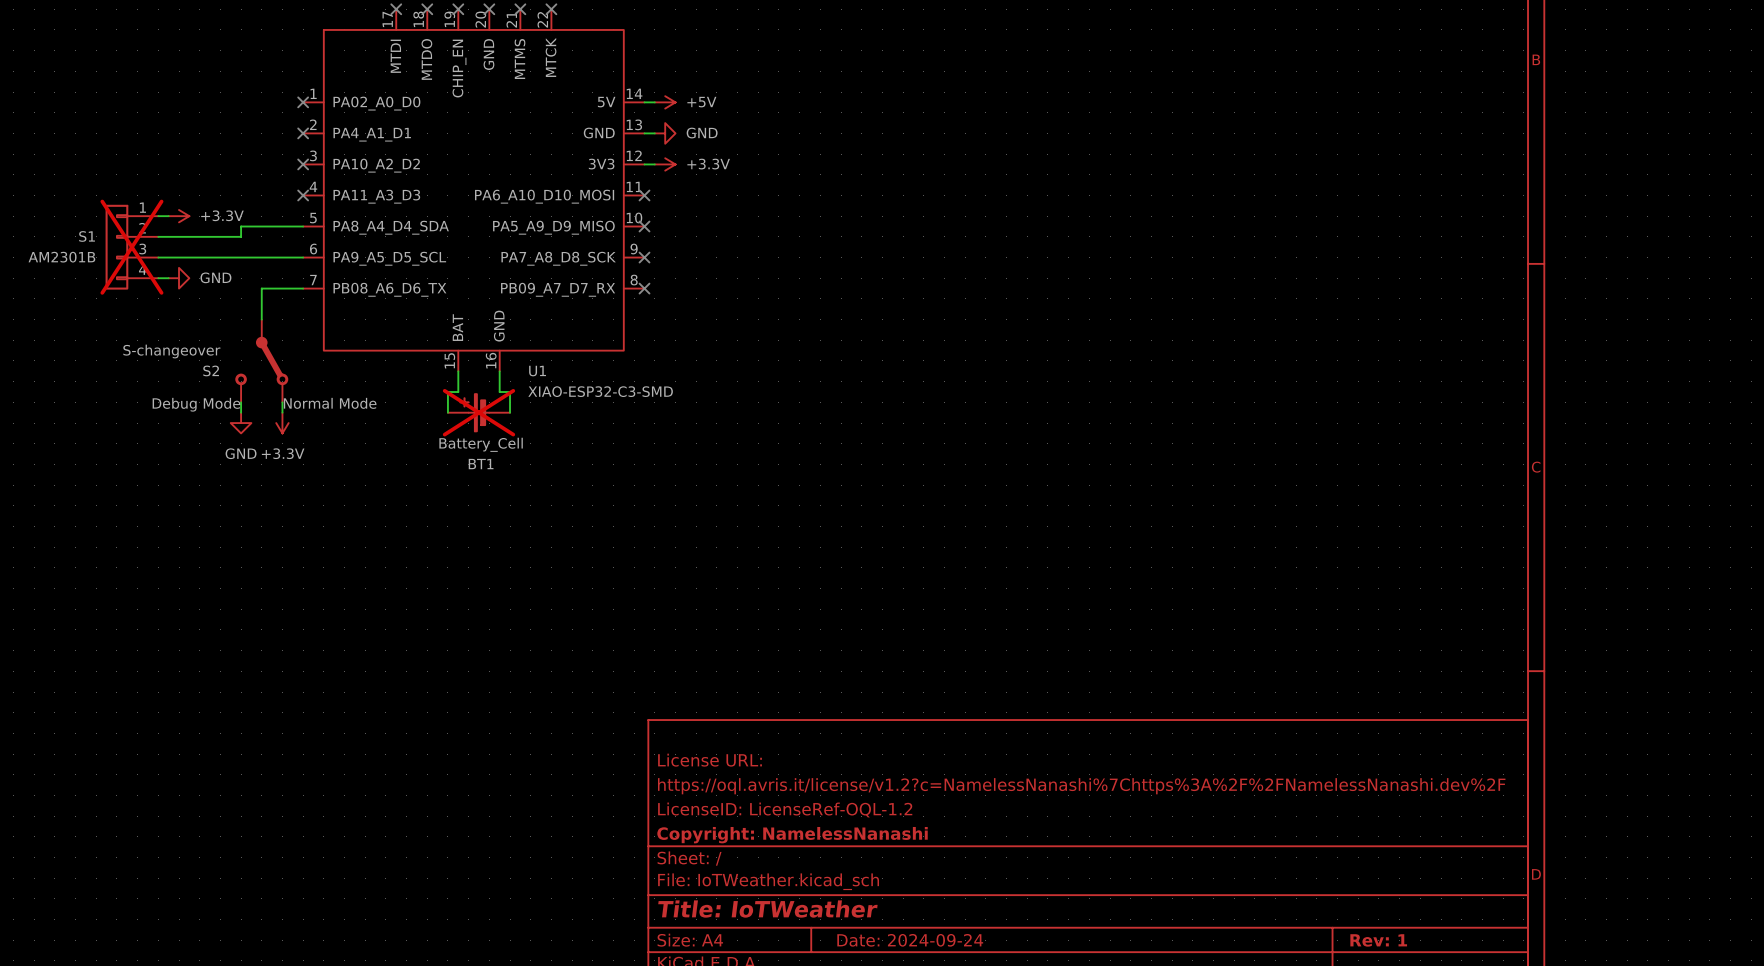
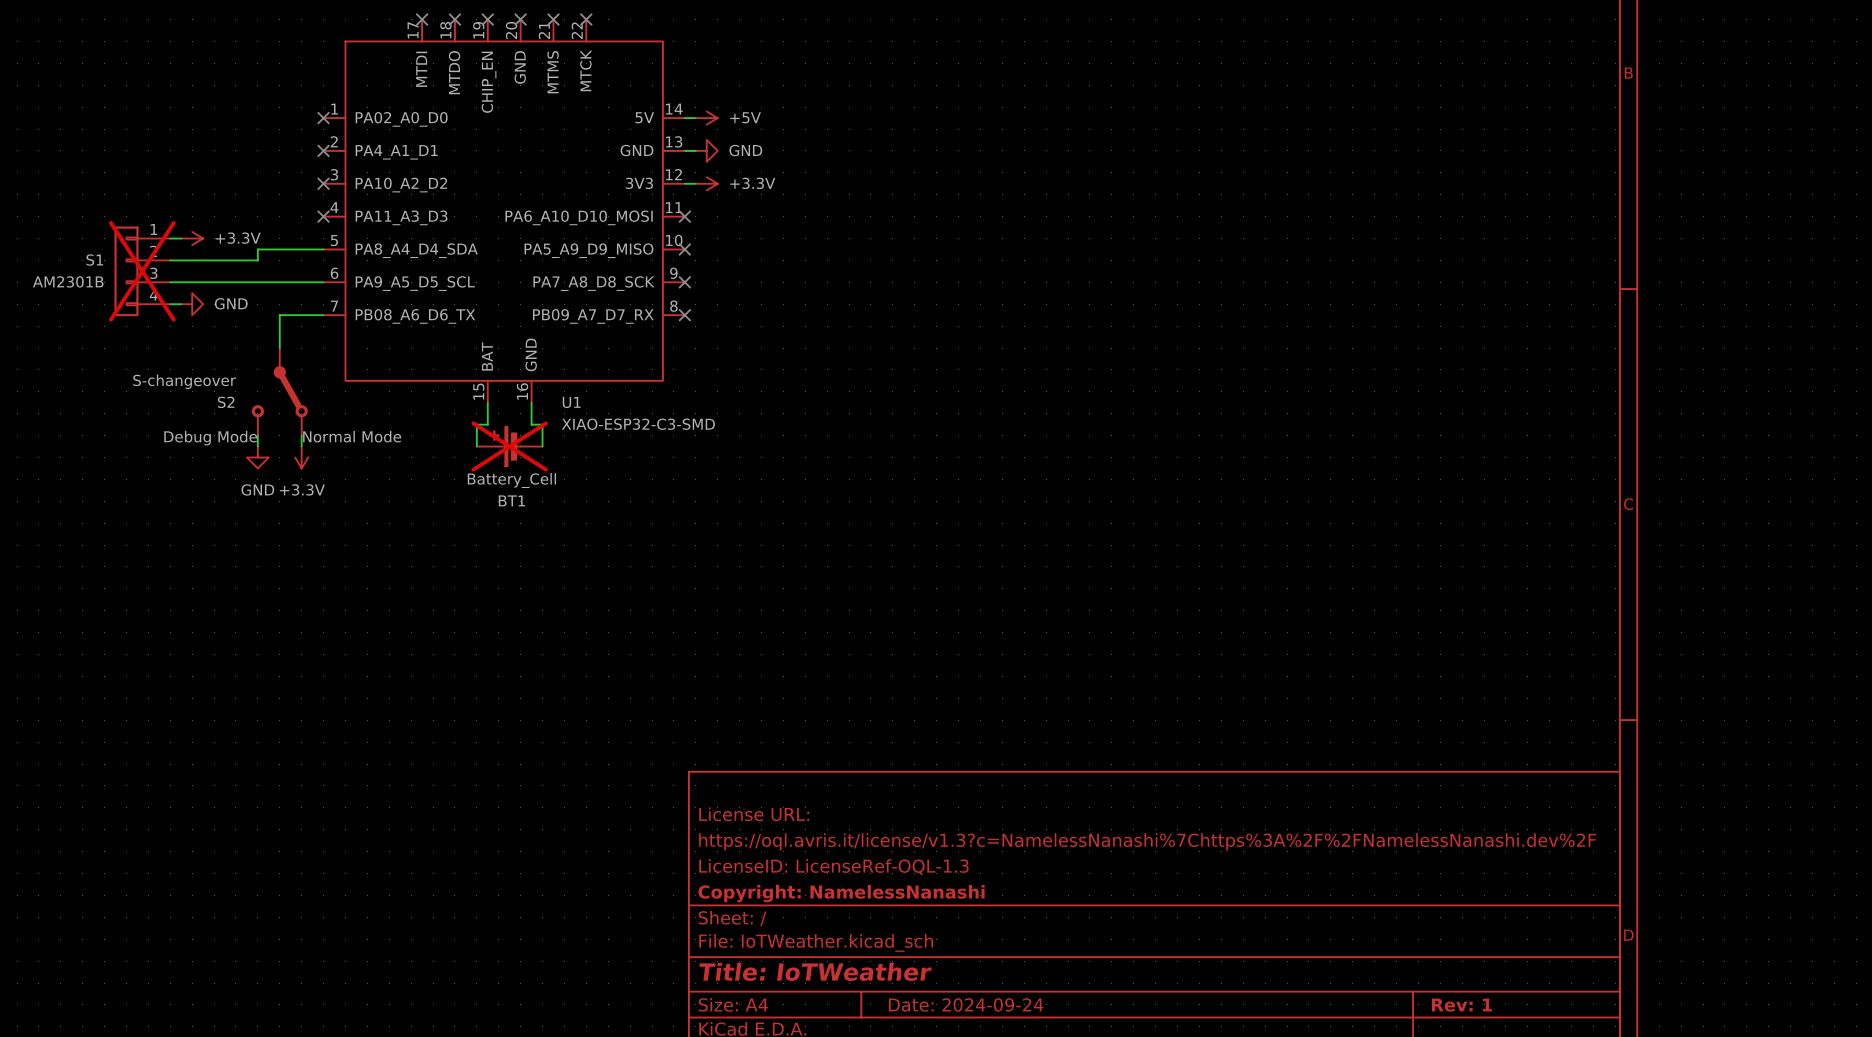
title block: https://oql.avris.it/license/v1.2?c=NamelessNanashi%7Chttps%3A%2F%2FNamelessNanashi.dev%2F (1081, 786) -> https://oql.avris.it/license/v1.3?c=NamelessNanashi%7Chttps%3A%2F%2FNamelessNanashi.dev%2F (1147, 841)
title block: LicenseID: LicenseRef-OQL-1.2 (785, 809) -> LicenseID: LicenseRef-OQL-1.3 (833, 867)

